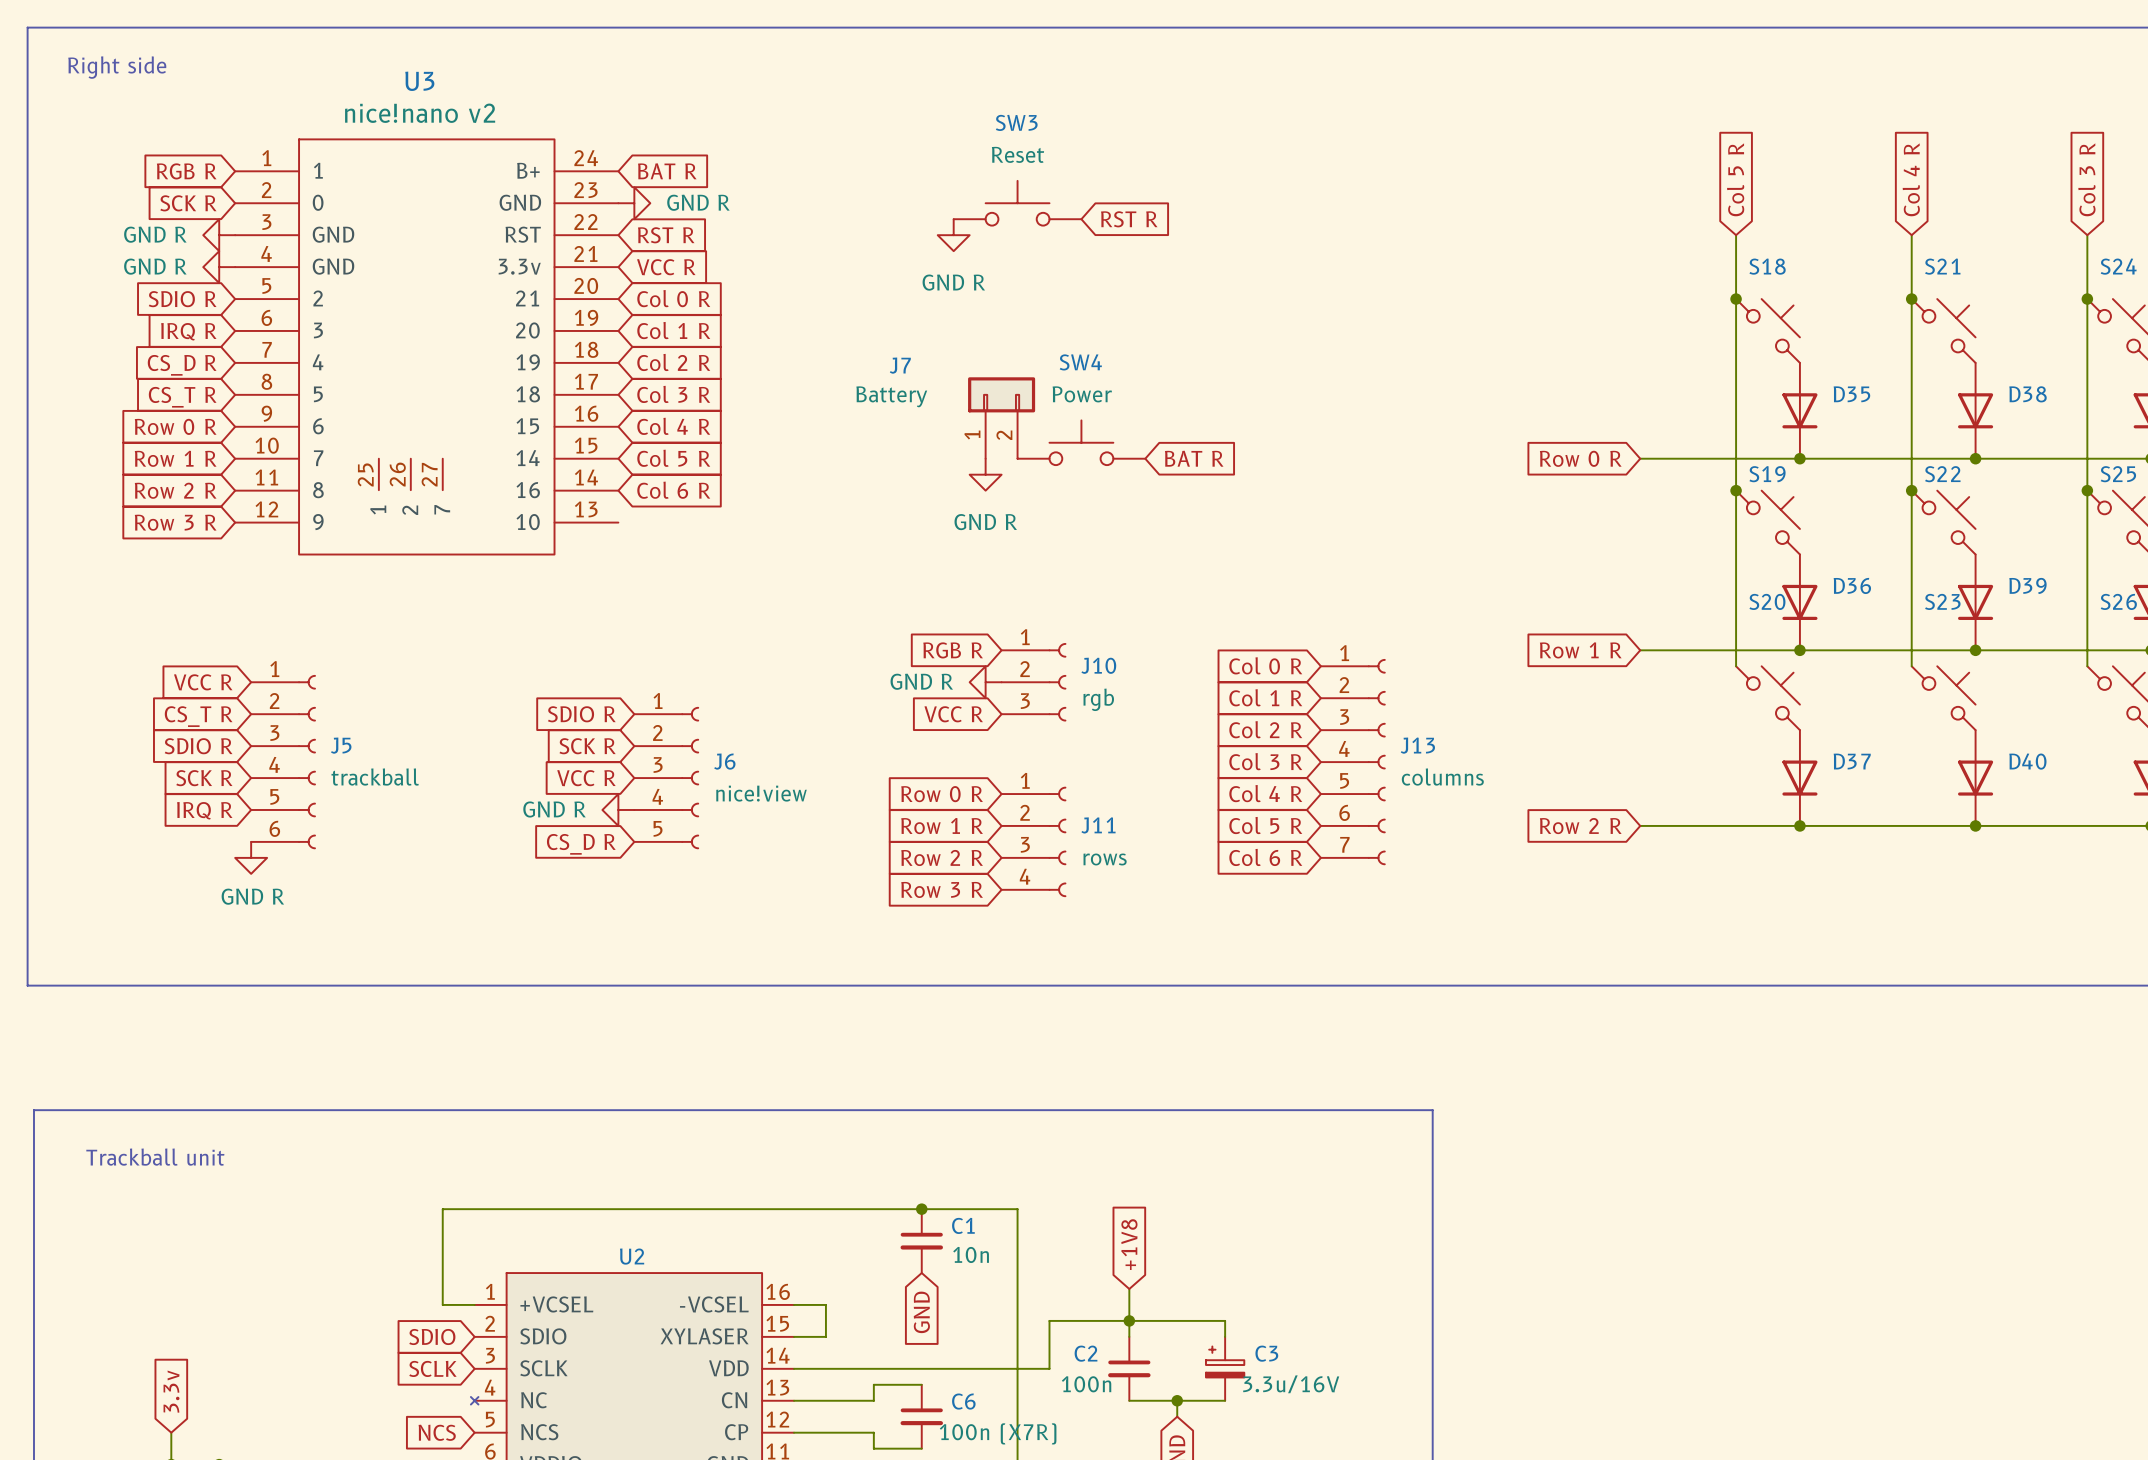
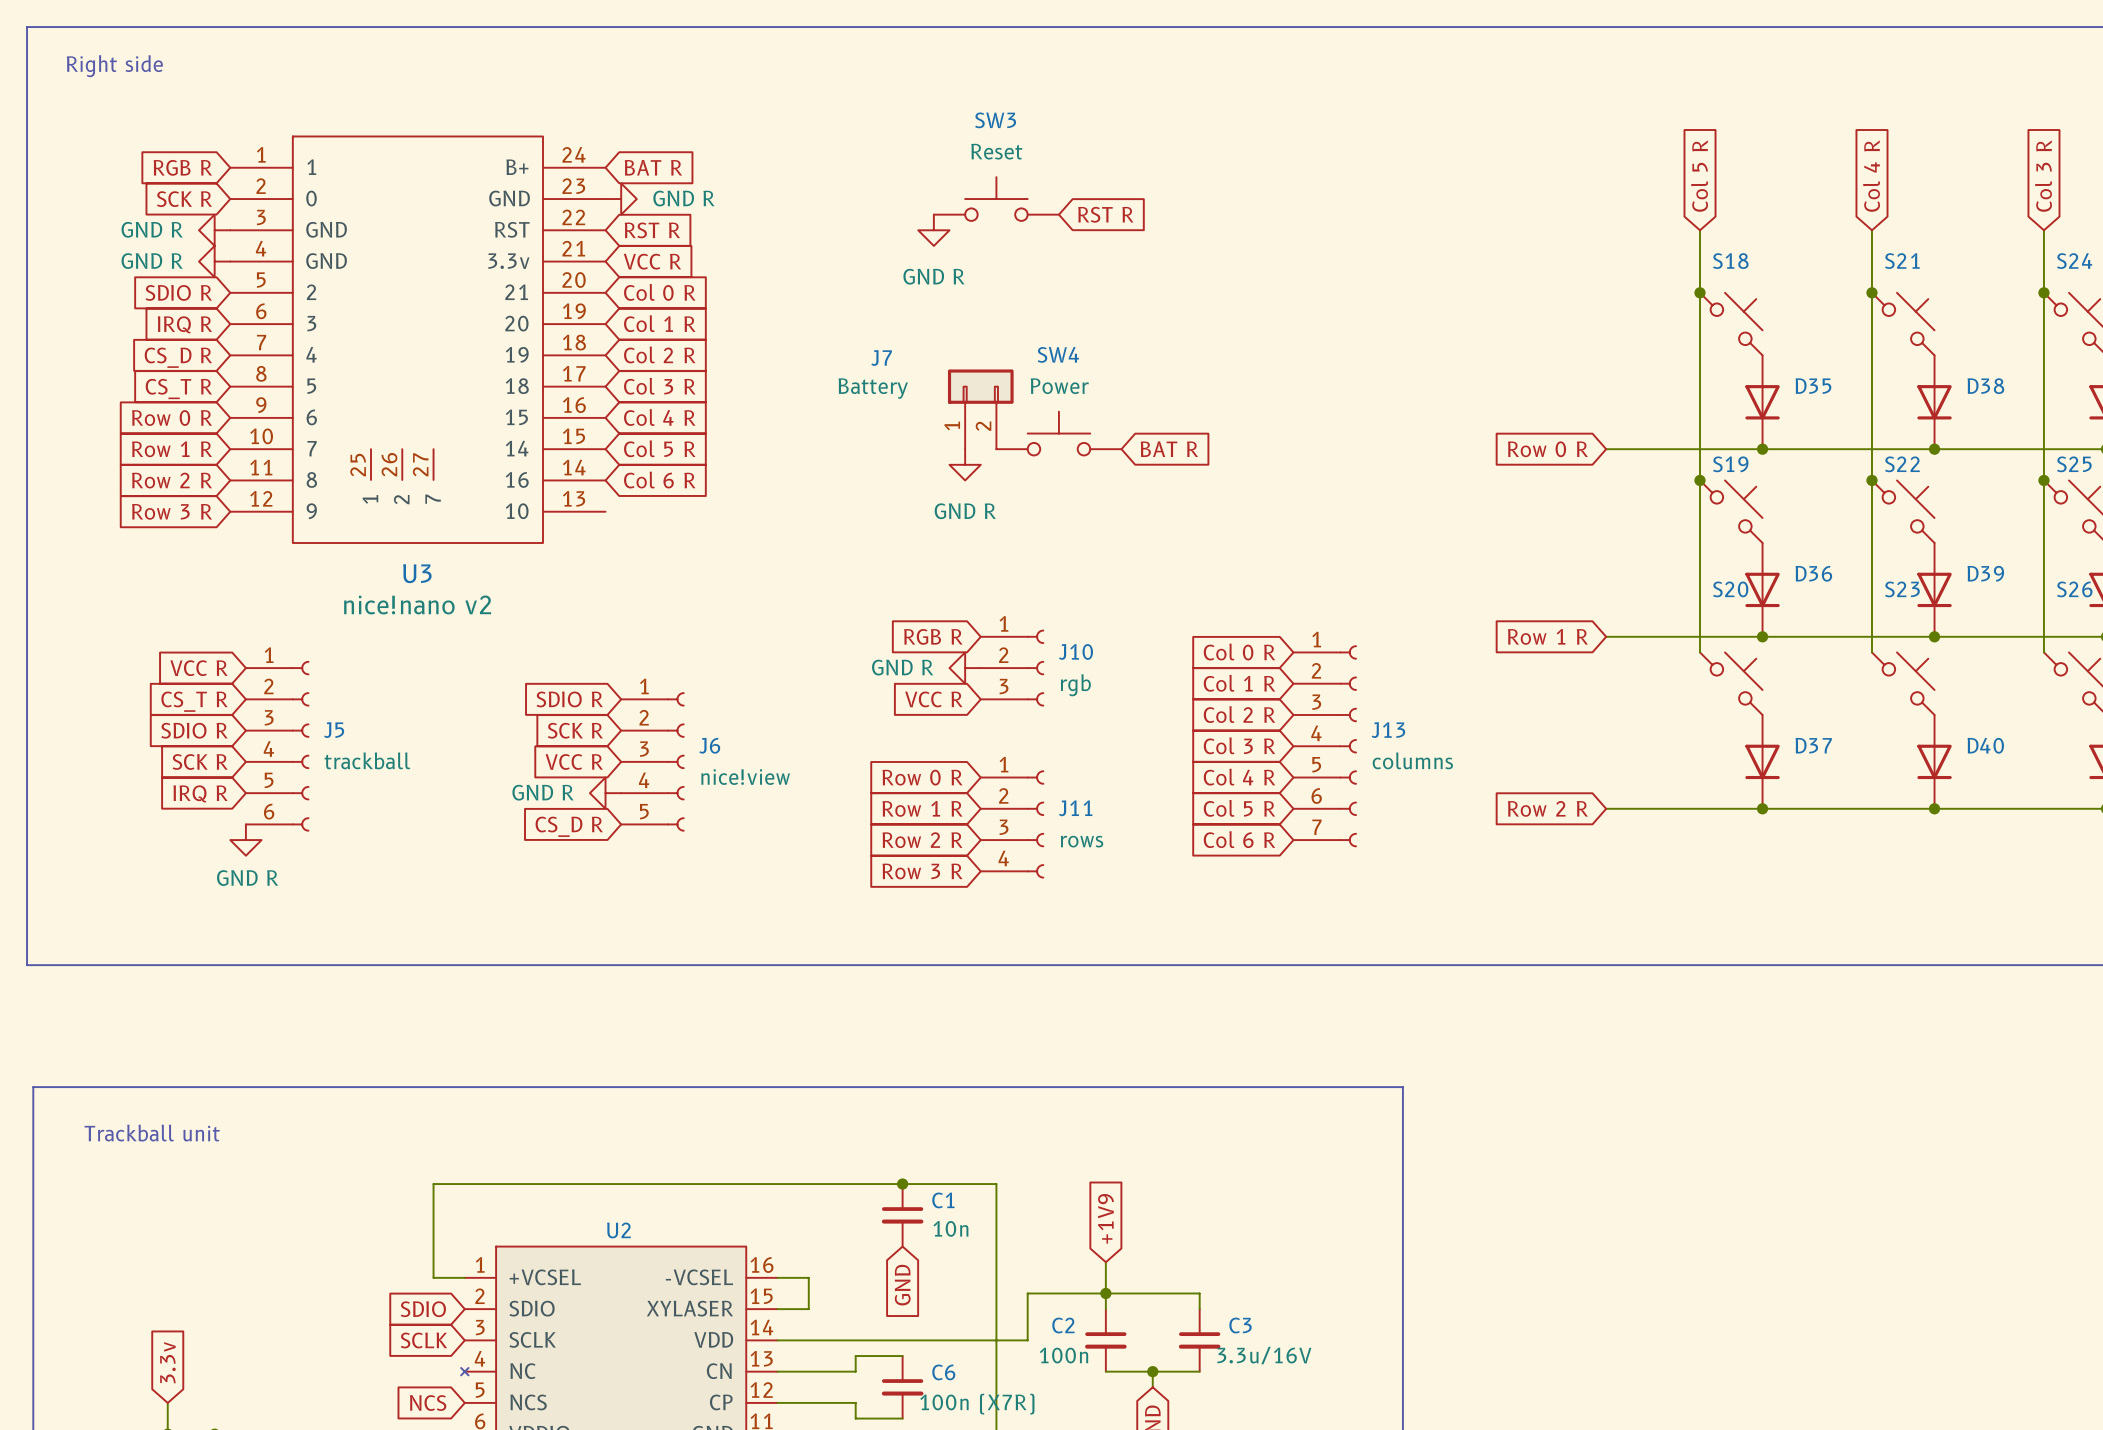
U3 name position: U3 (419, 81) -> U3 (417, 573)
U3 value position: nice!nano v2 (420, 113) -> nice!nano v2 (417, 604)
global label: +1V8 (1129, 1244) -> +1V9 (1105, 1218)
C3 symbol: [1205, 1336, 1245, 1401] -> [1178, 1309, 1221, 1372]

